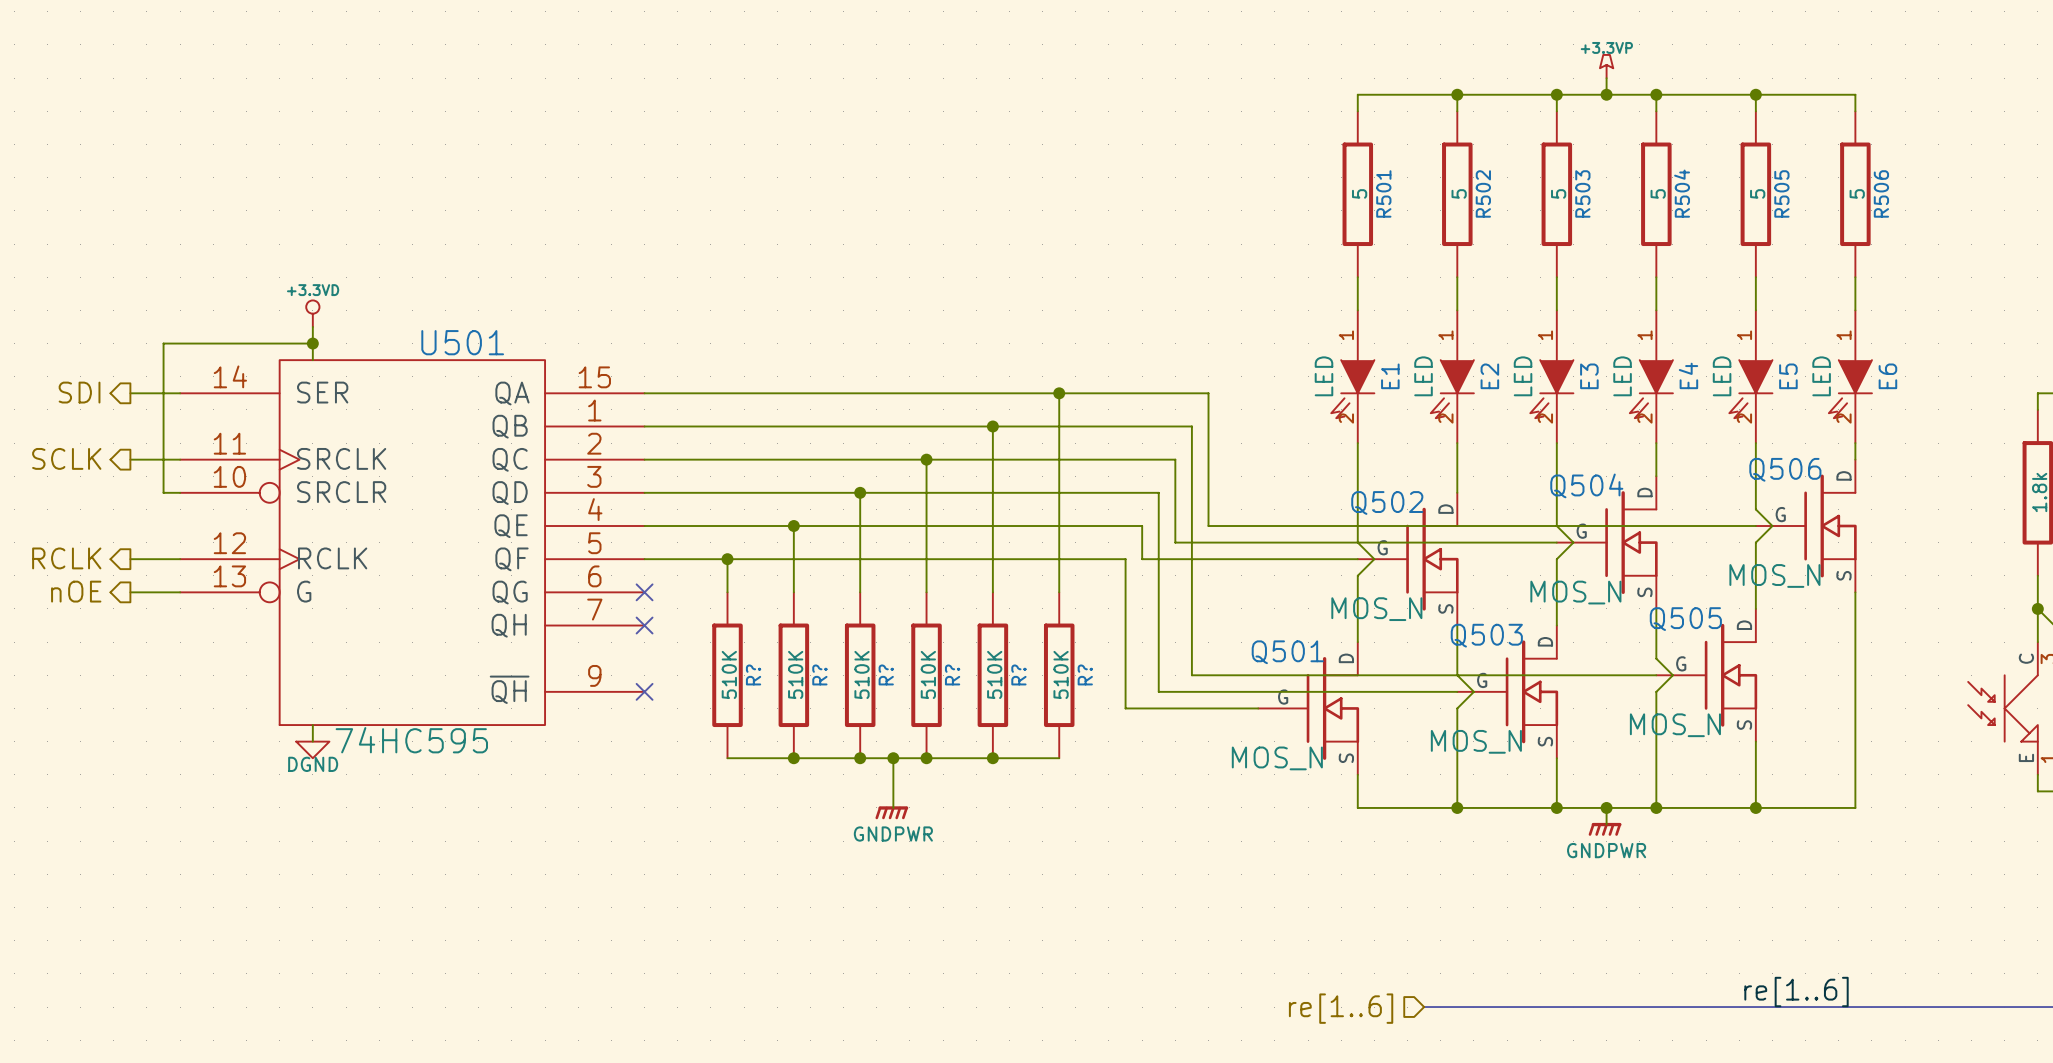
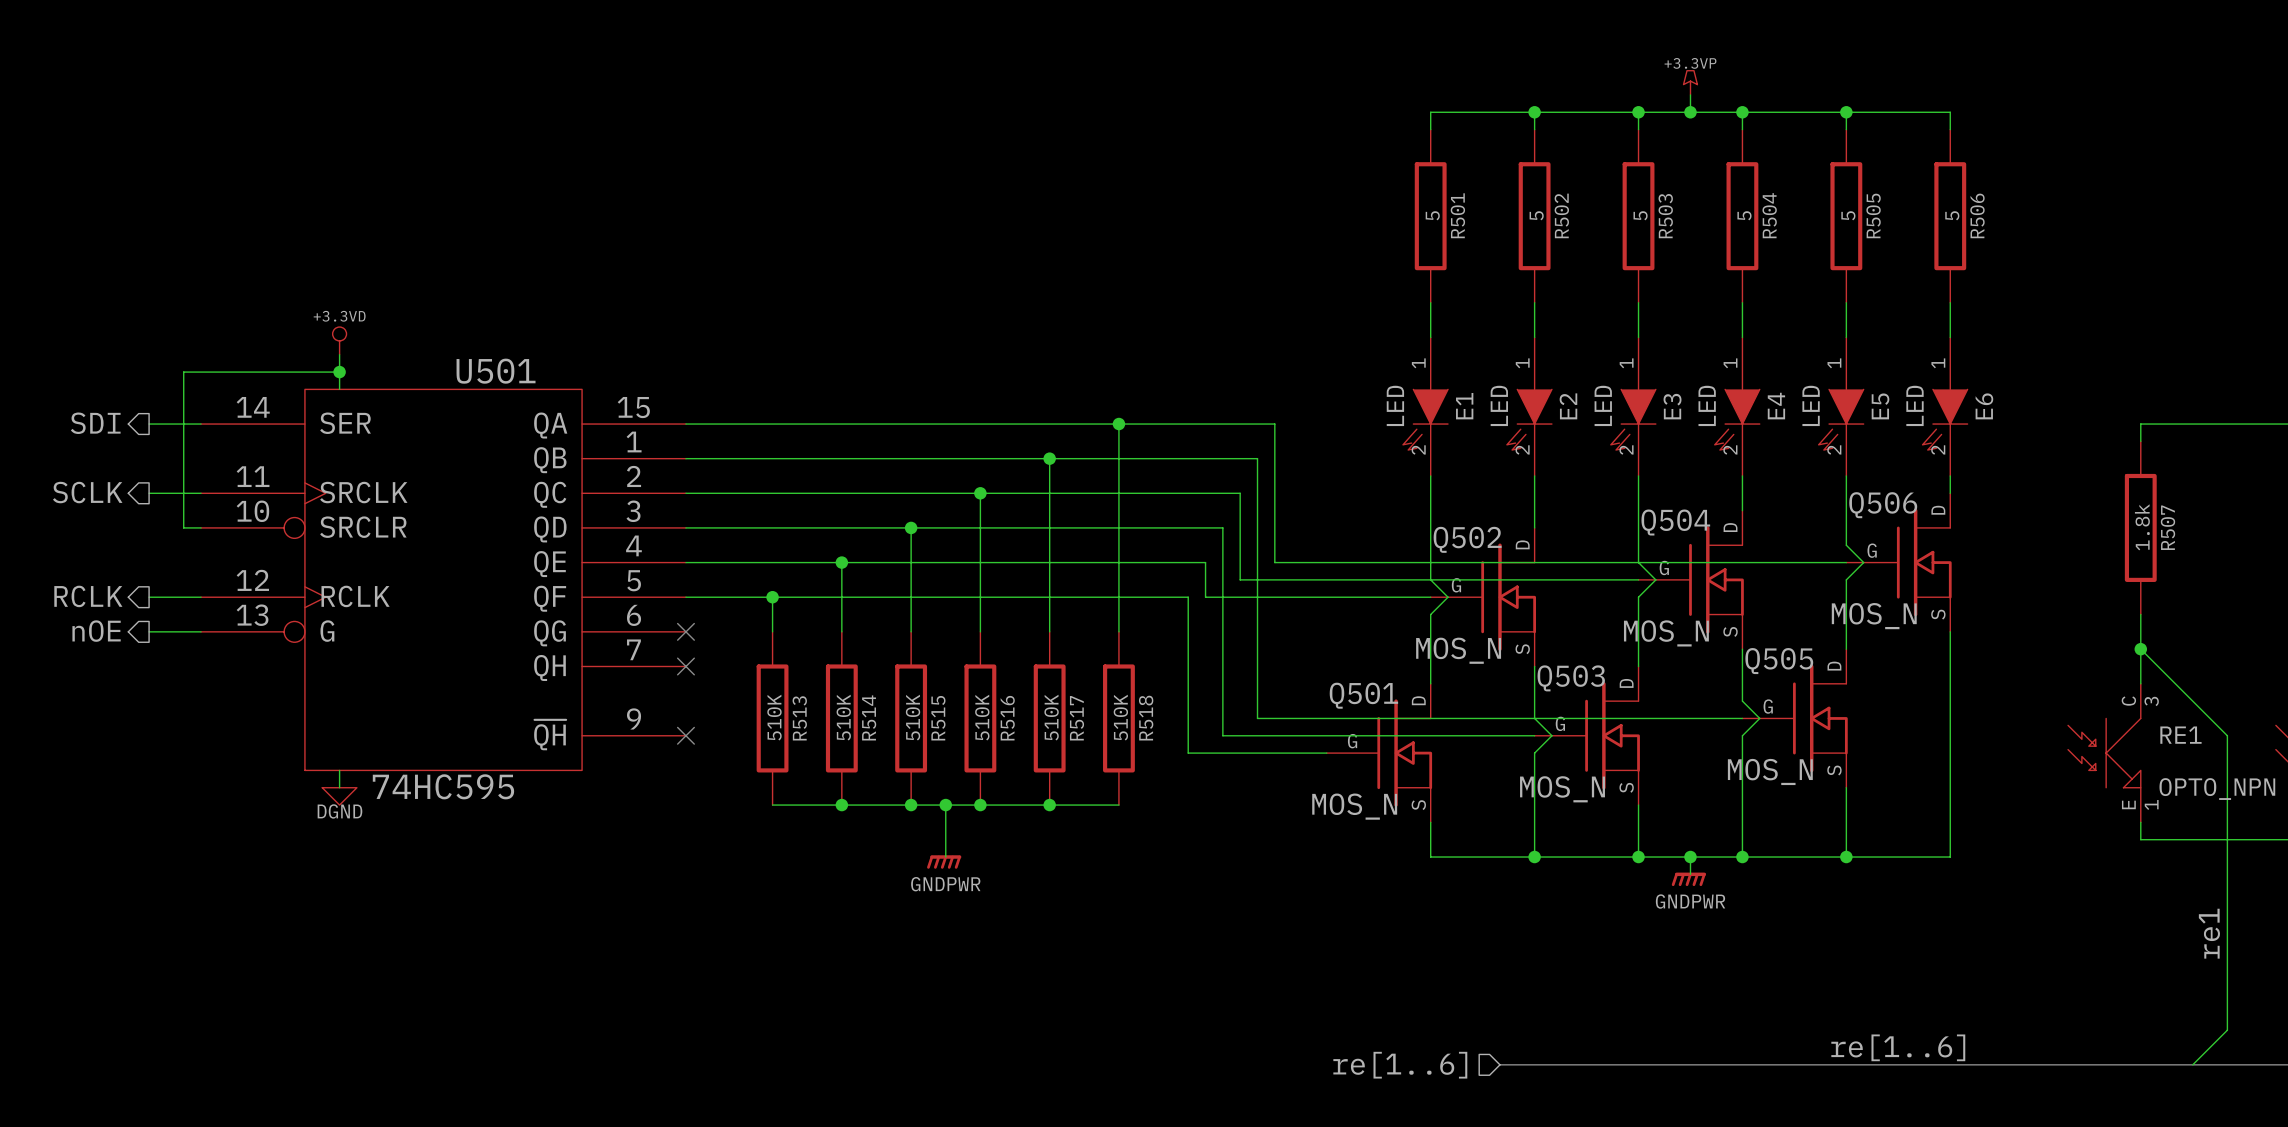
R? name: R? (753, 674) -> R513 (799, 718)
R? name: R? (819, 674) -> R514 (869, 717)
R? name: R? (886, 674) -> R515 (938, 718)
R? name: R? (952, 674) -> R516 (1007, 718)
R? name: R? (1018, 674) -> R517 (1076, 718)
R? name: R? (1085, 674) -> R518 (1146, 718)

